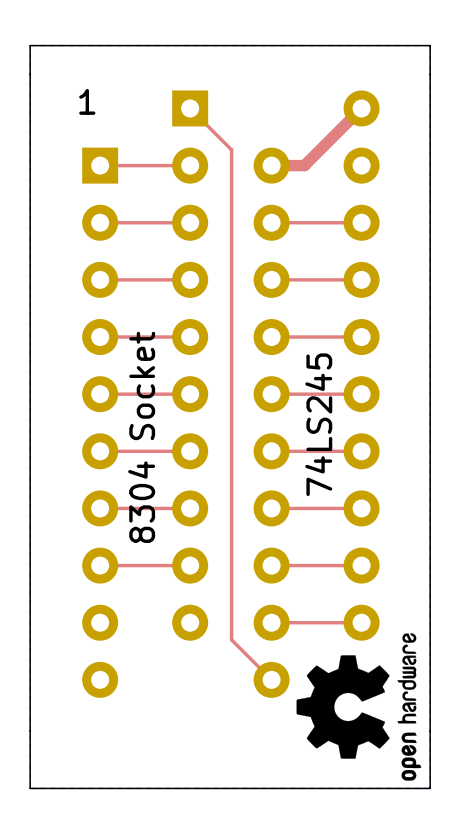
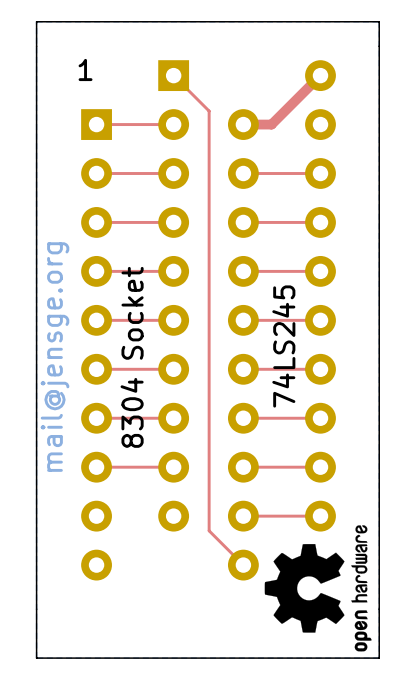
text: none -> mail@jensge.org (54, 357)

